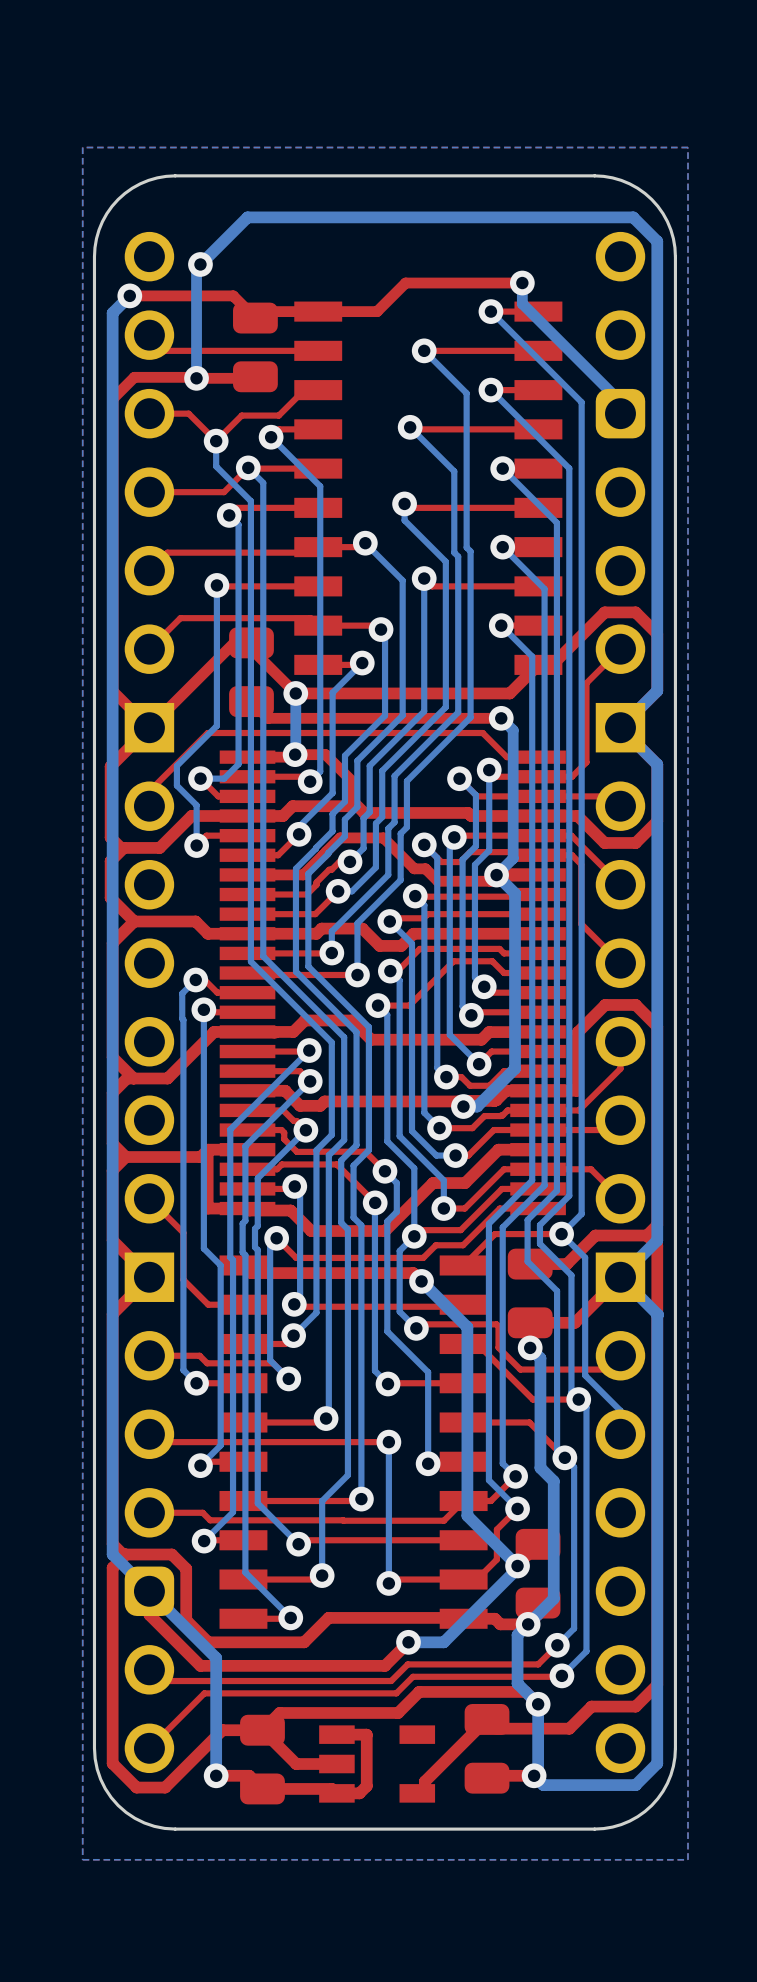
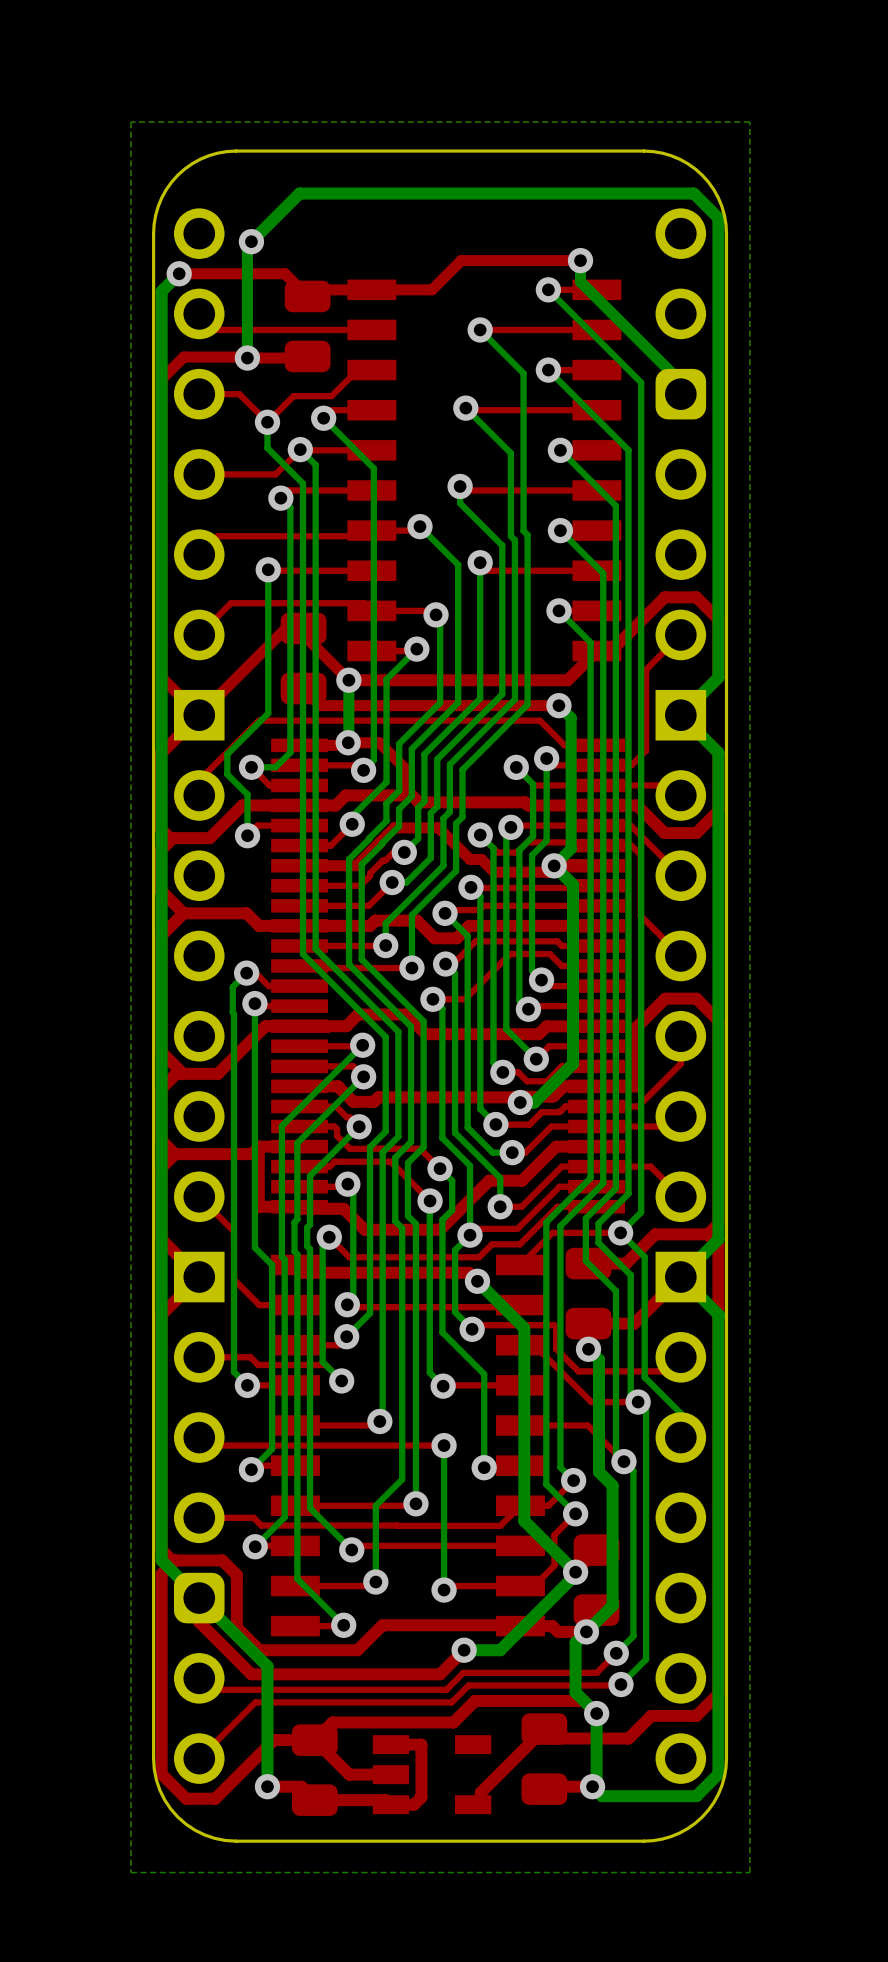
part footprint: [92, 174, 677, 1831] -> [152, 149, 729, 1843]

